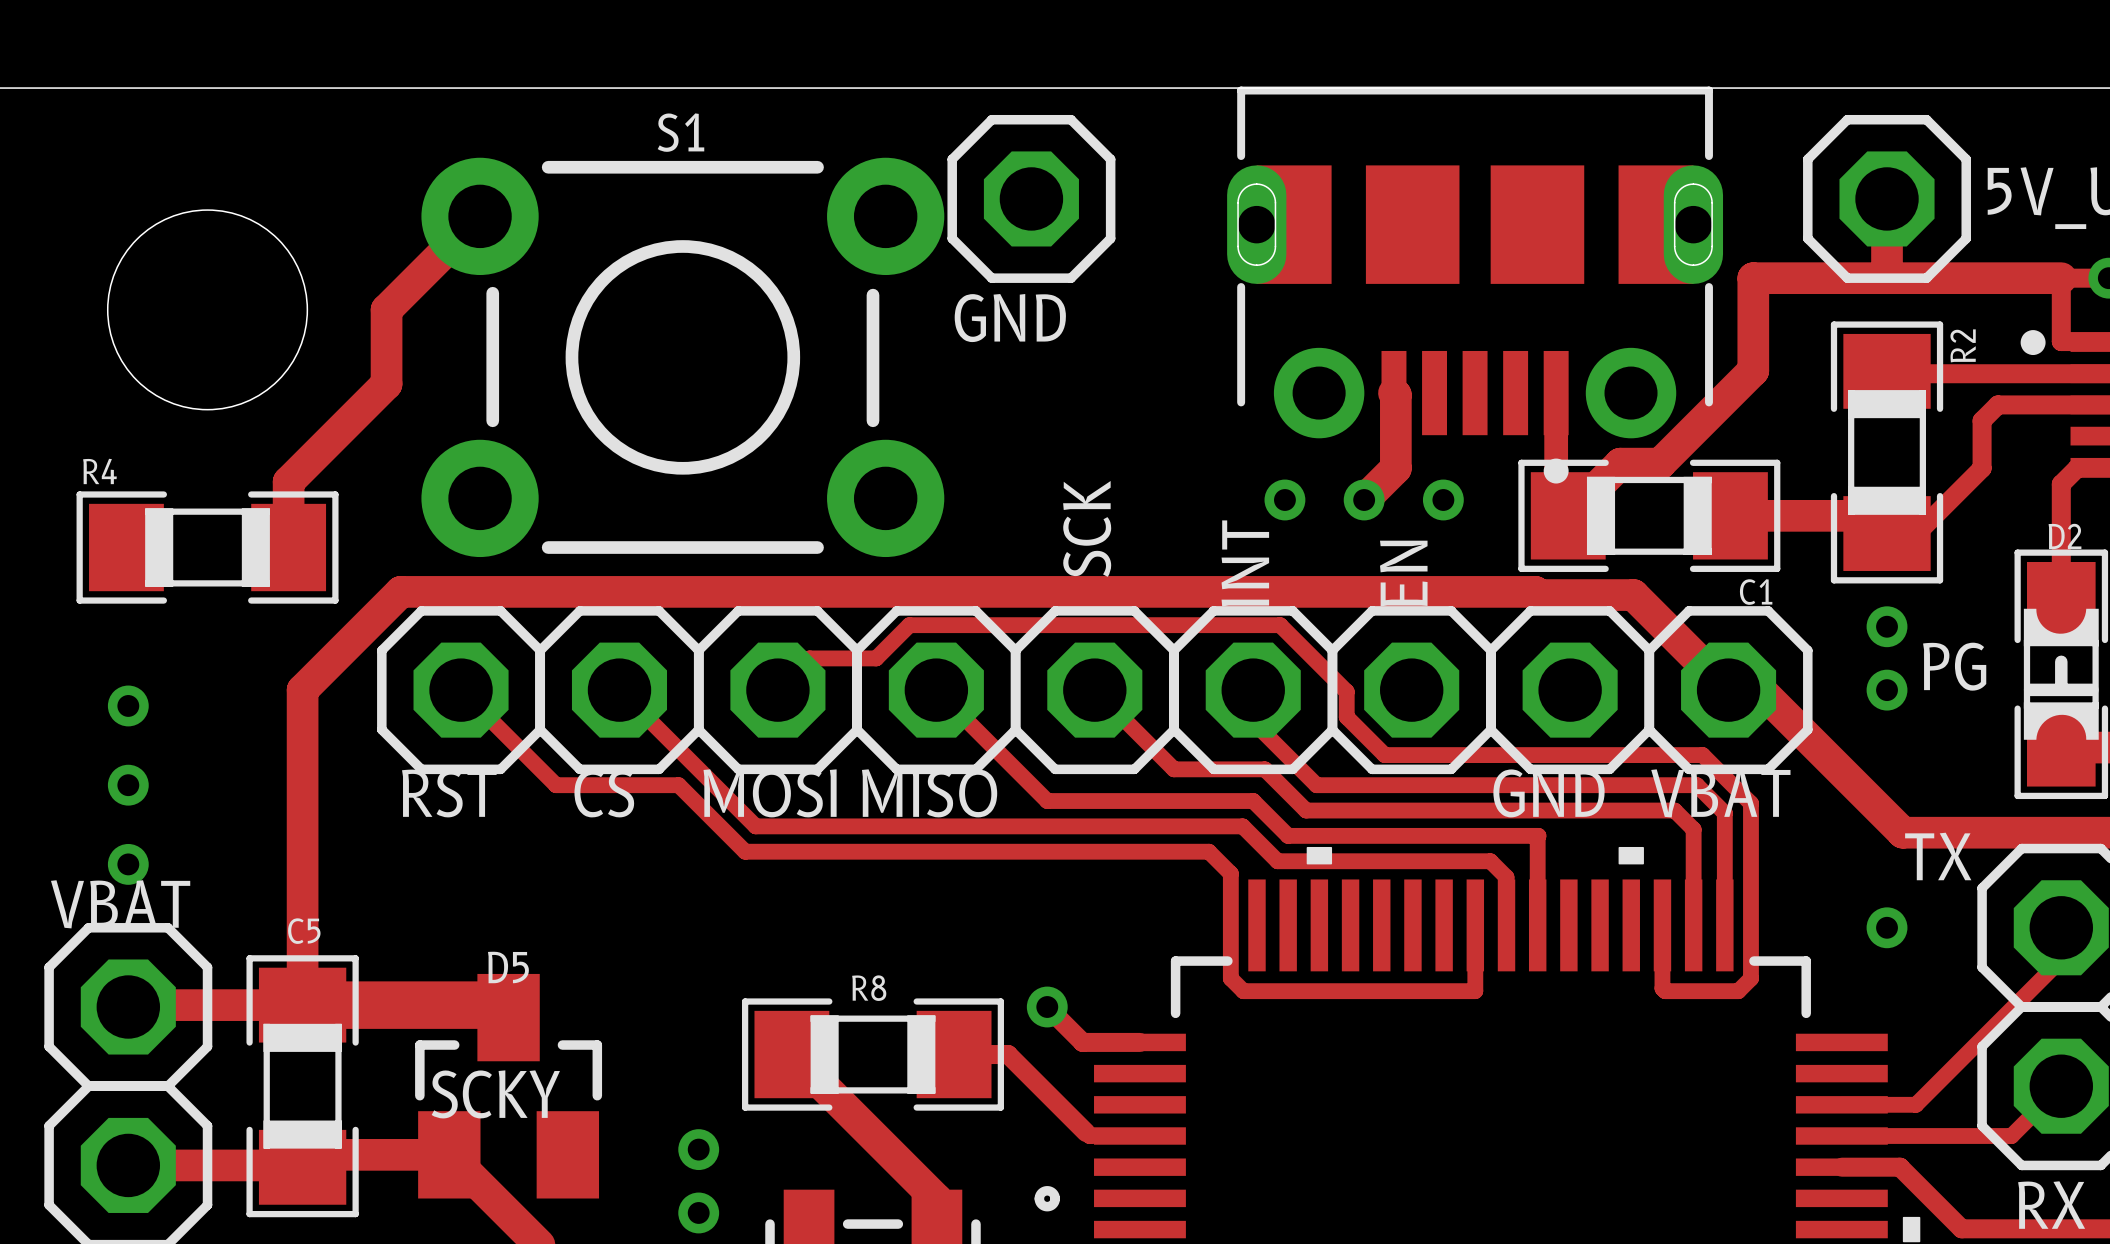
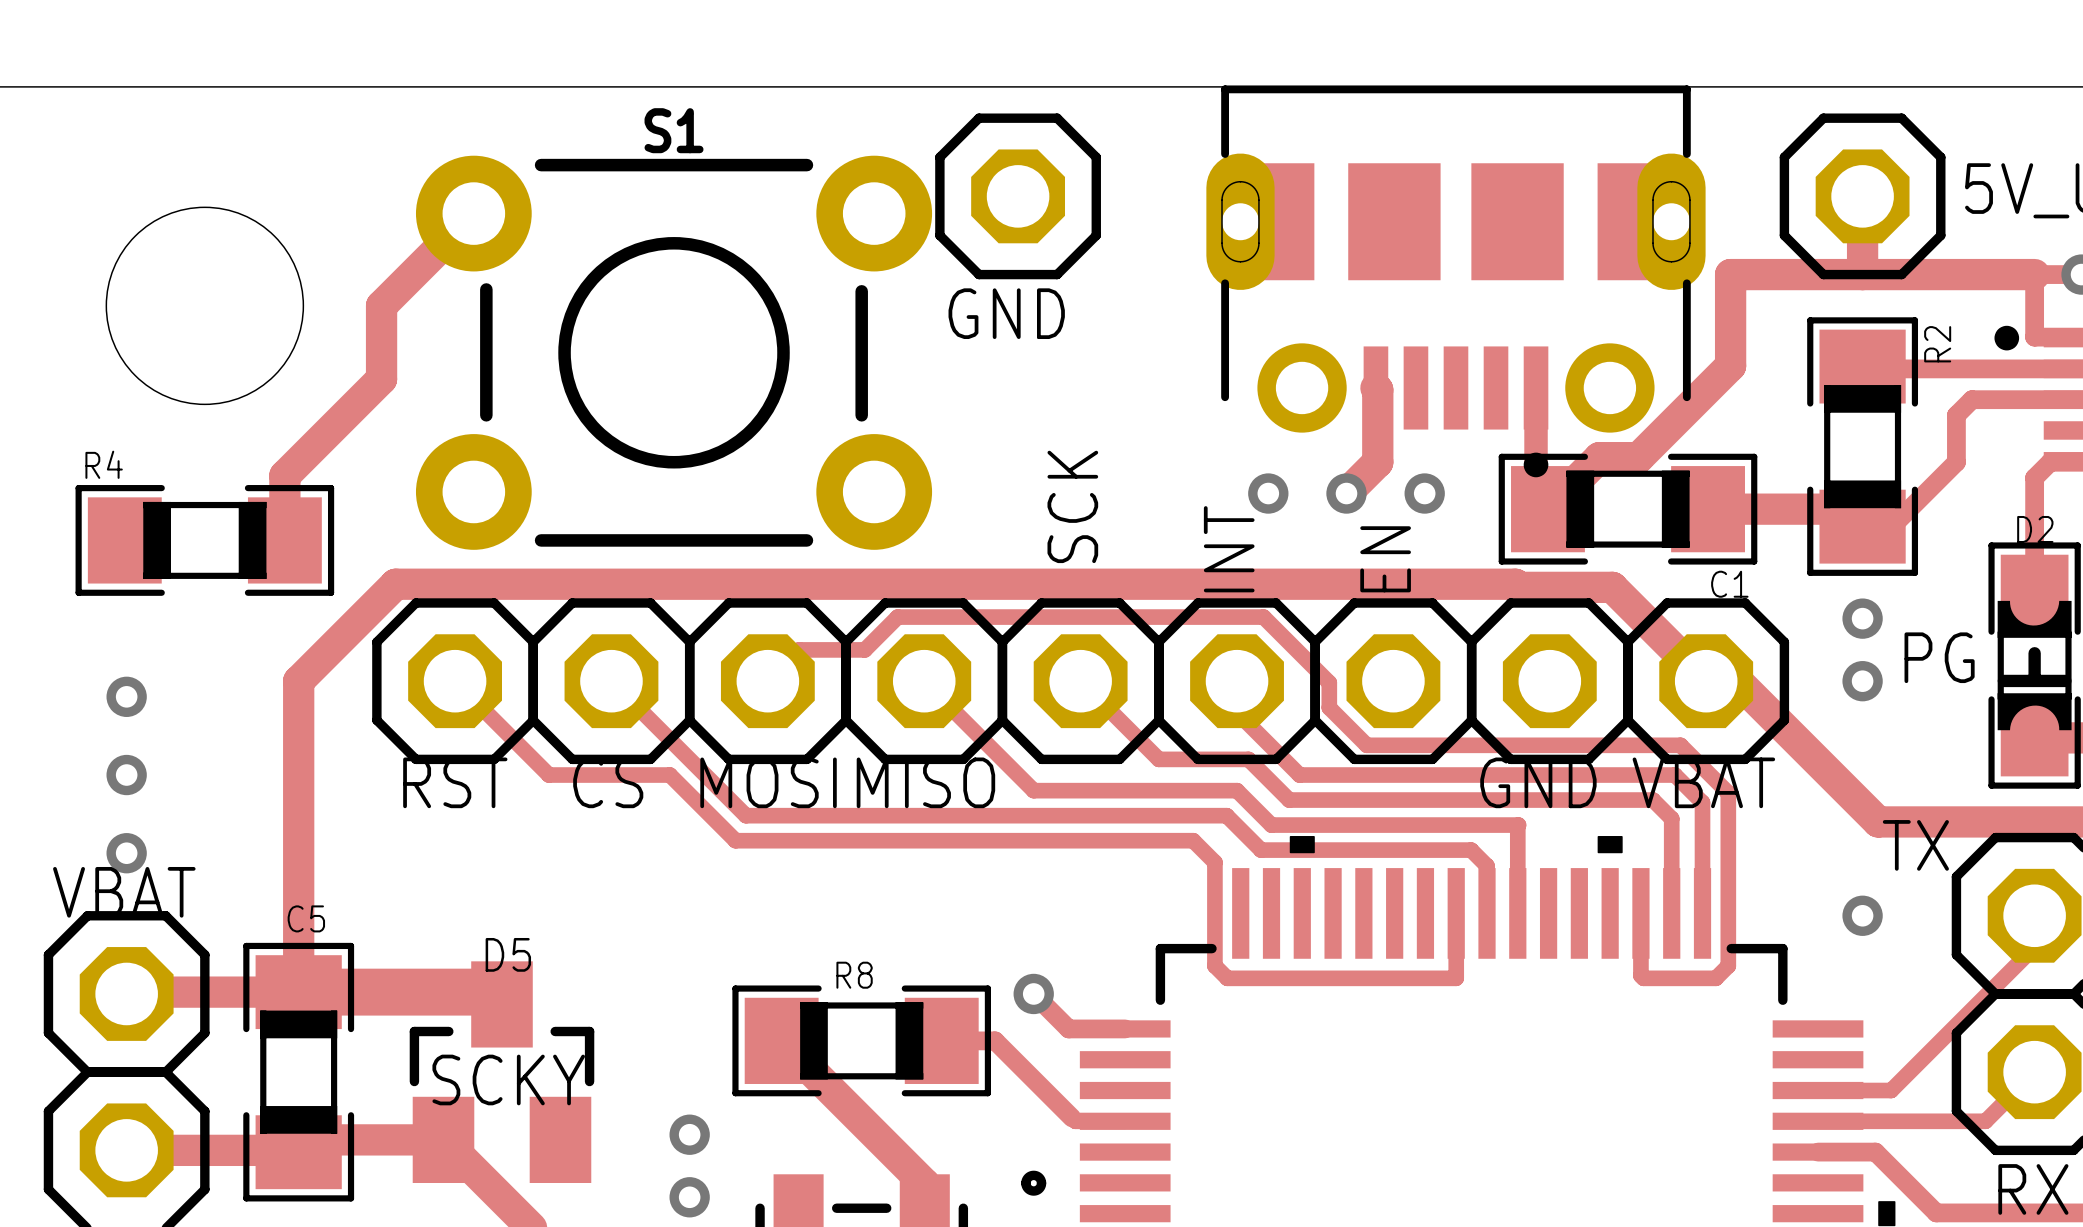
part footprint: [1227, 86, 1724, 484] -> [1206, 85, 1706, 478]

